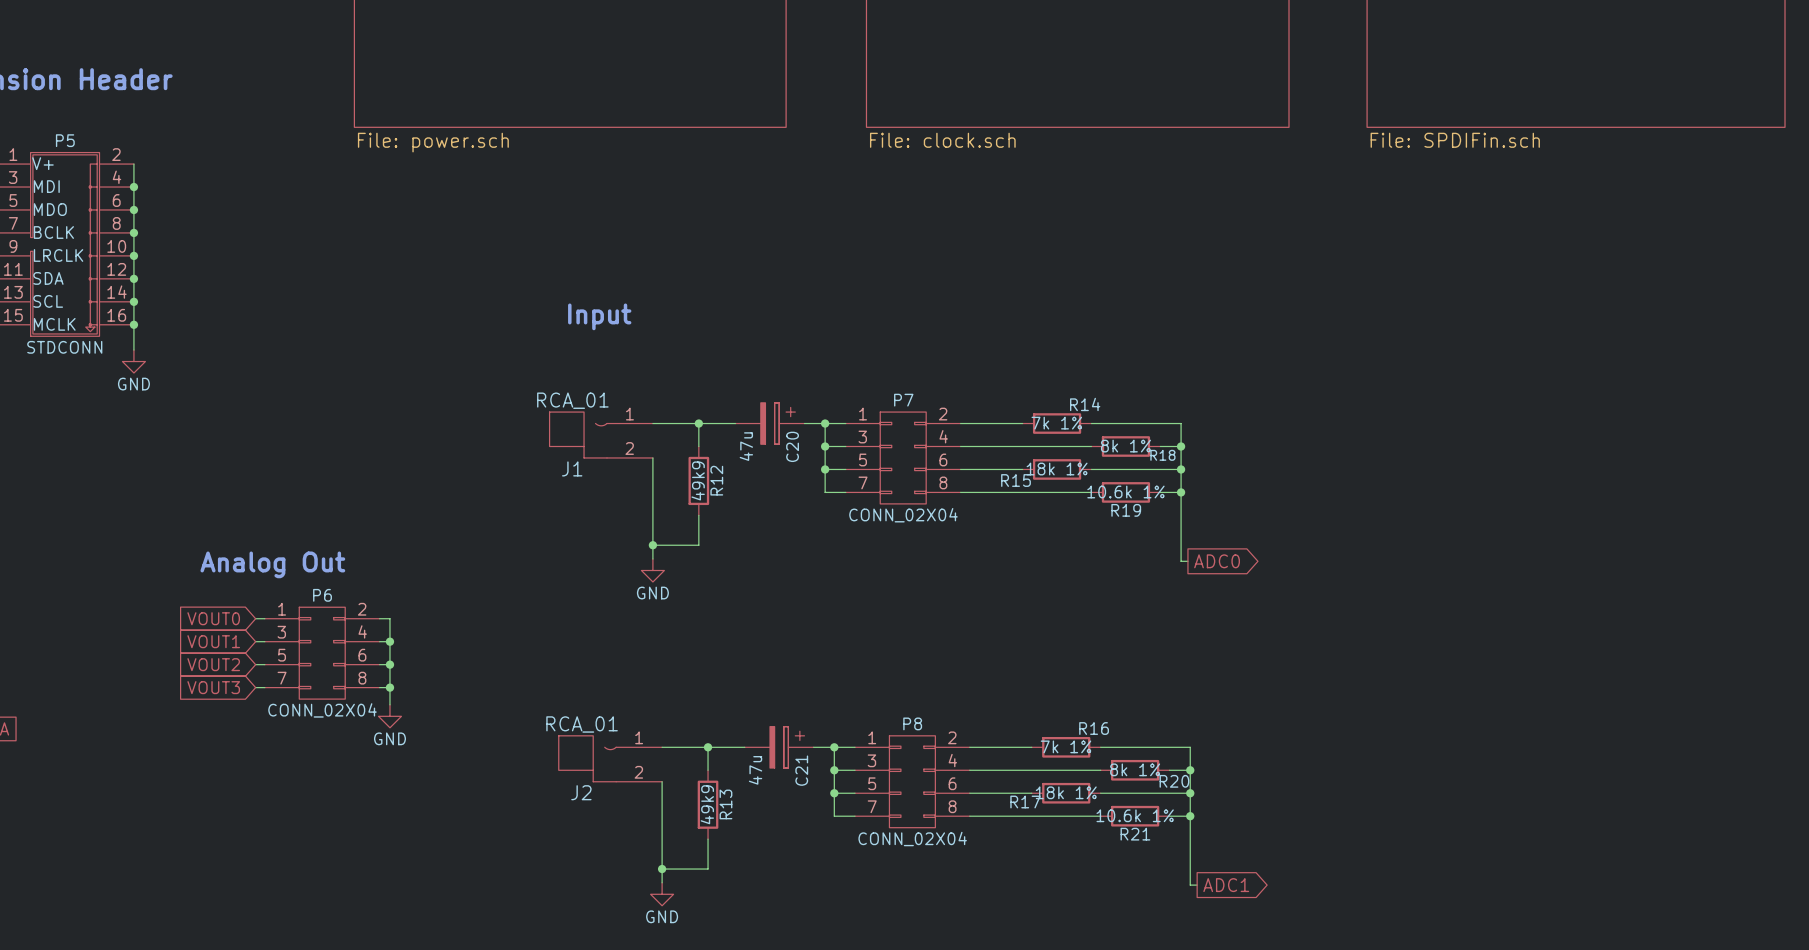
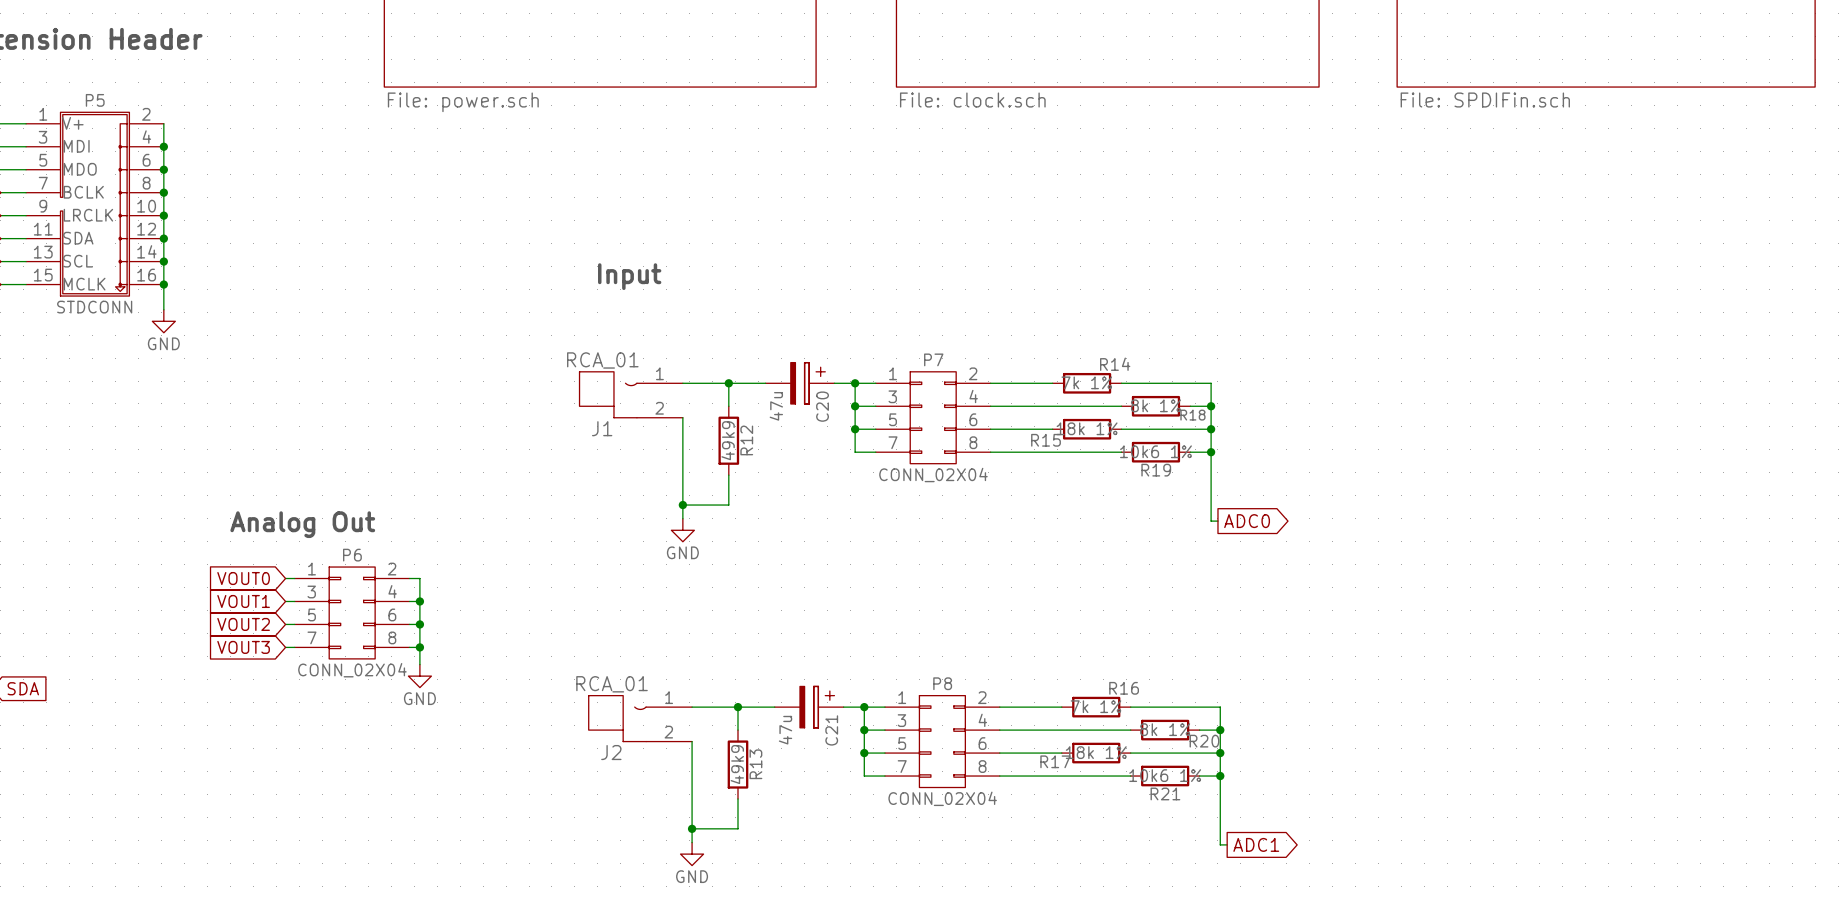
R19 value: 10.6k 1% (1125, 491) -> 10k6 1% (1155, 451)
R21 value: 10.6k 1% (1135, 815) -> 10k6 1% (1165, 775)

